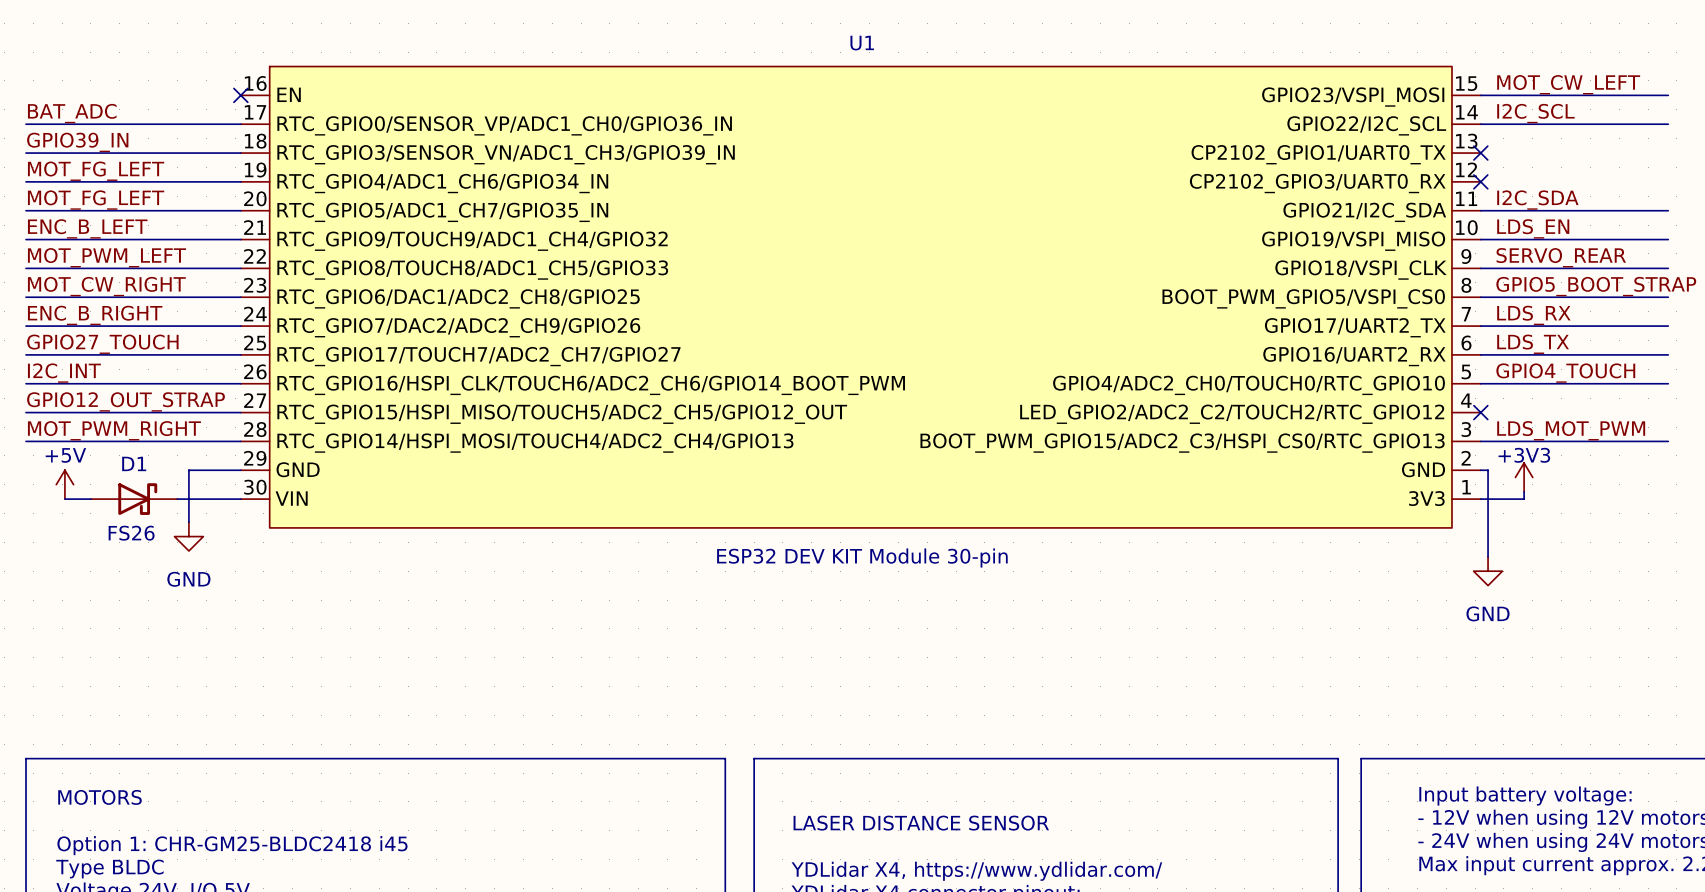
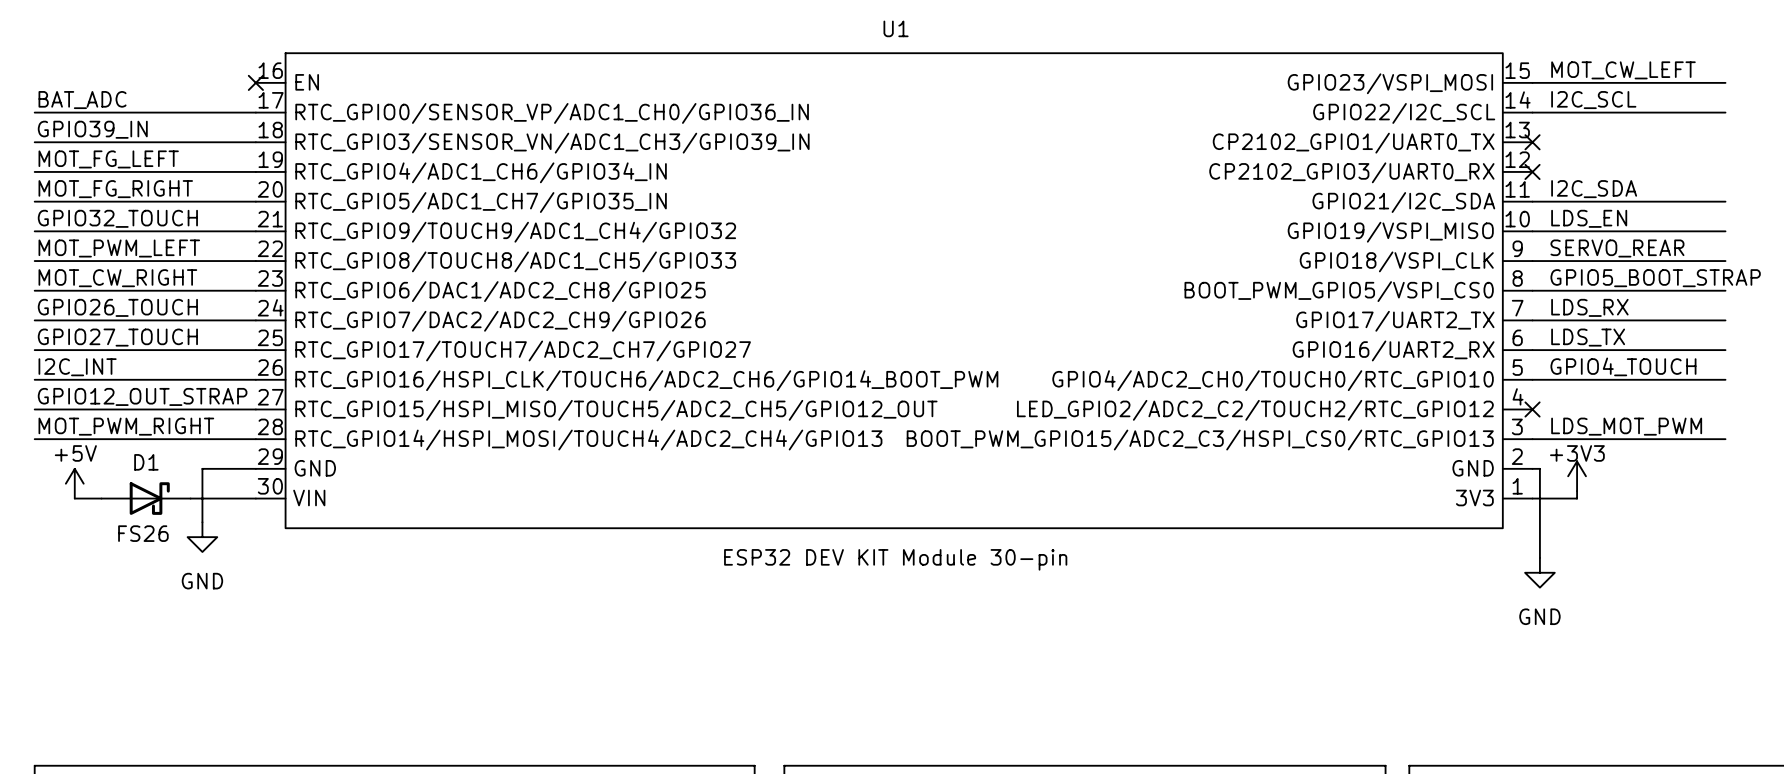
label: MOT_FG_LEFT (96, 200) -> MOT_FG_RIGHT (115, 189)
label: ENC_B_LEFT (87, 228) -> GPIO32_TOUCH (117, 218)
label: ENC_B_RIGHT (95, 315) -> GPIO26_TOUCH (117, 307)

